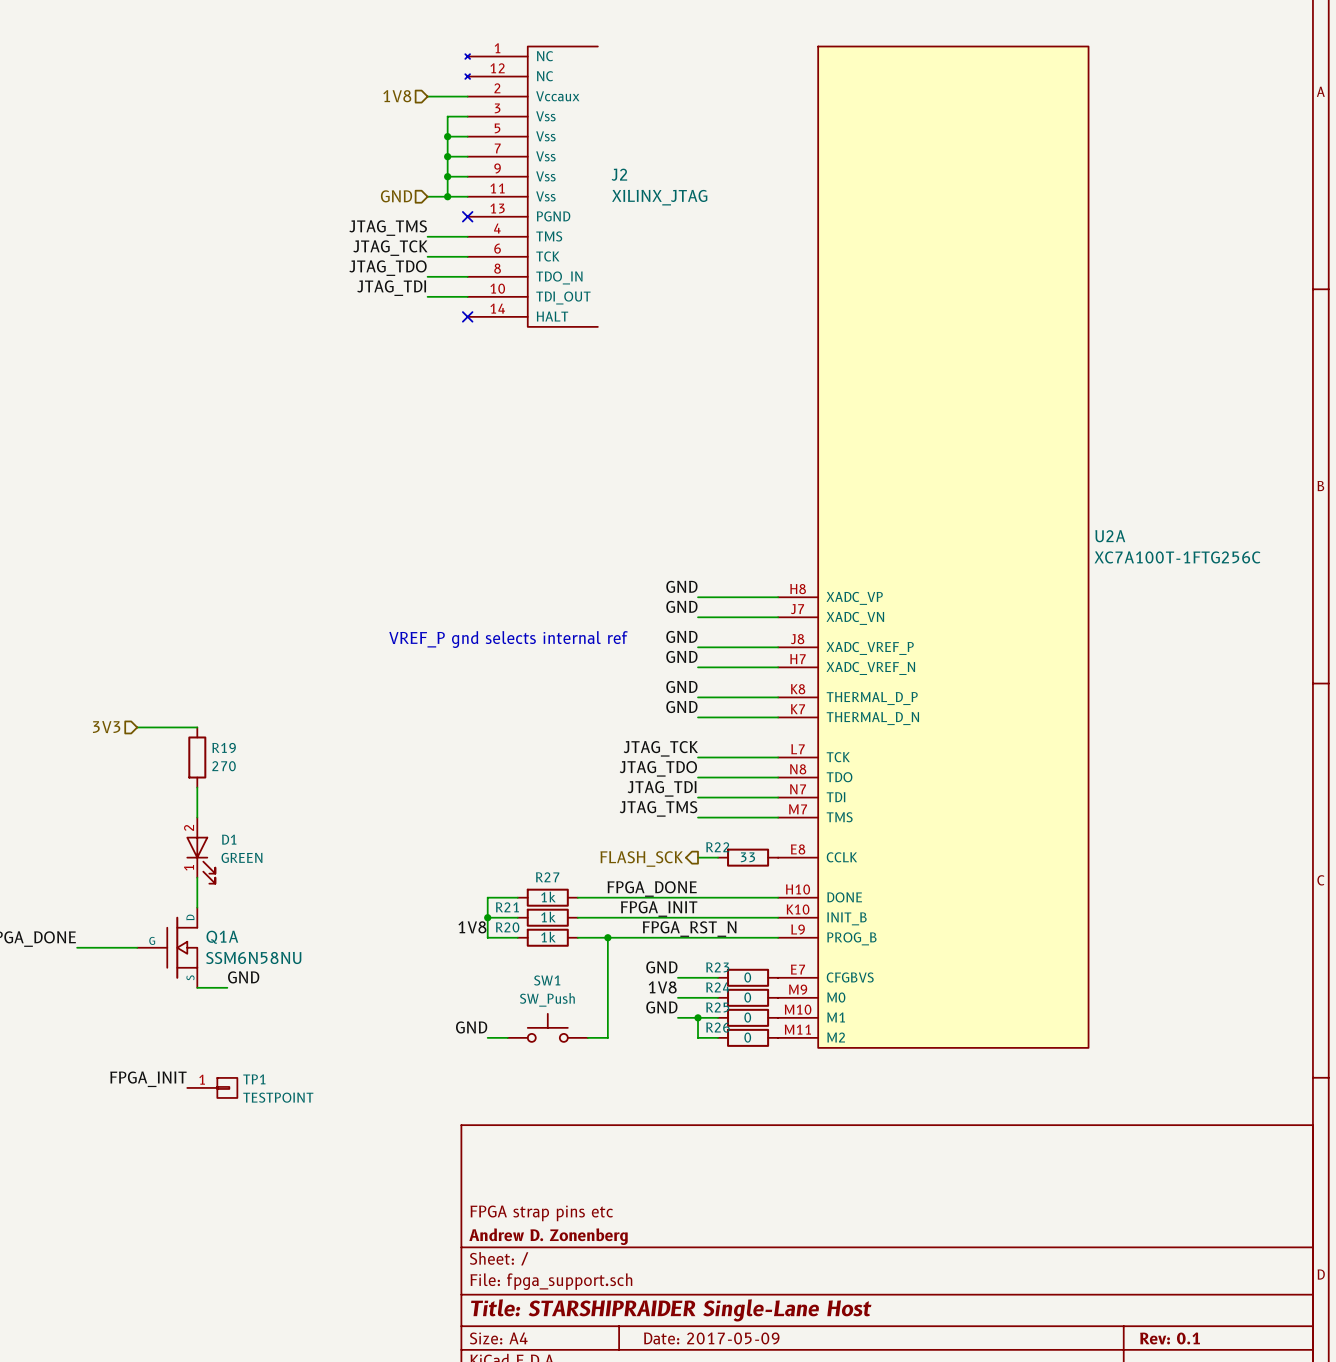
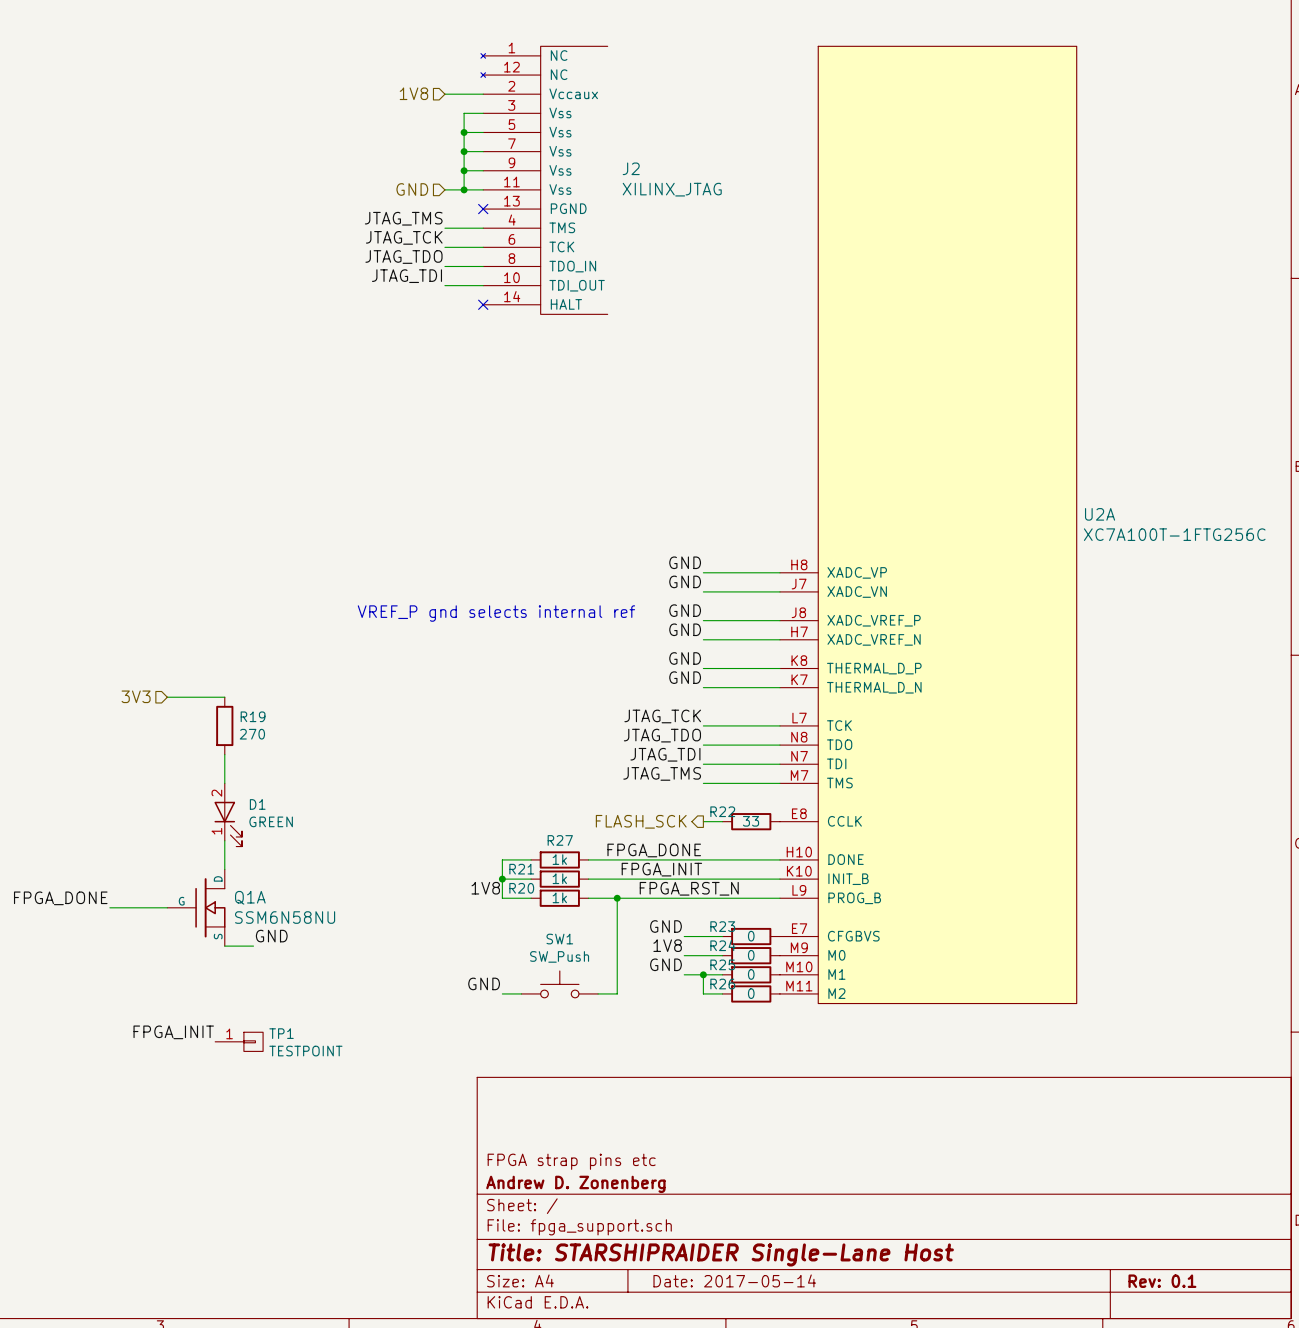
title block: Date: 2017-05-09 (711, 1338) -> Date: 2017-05-14 (734, 1280)

